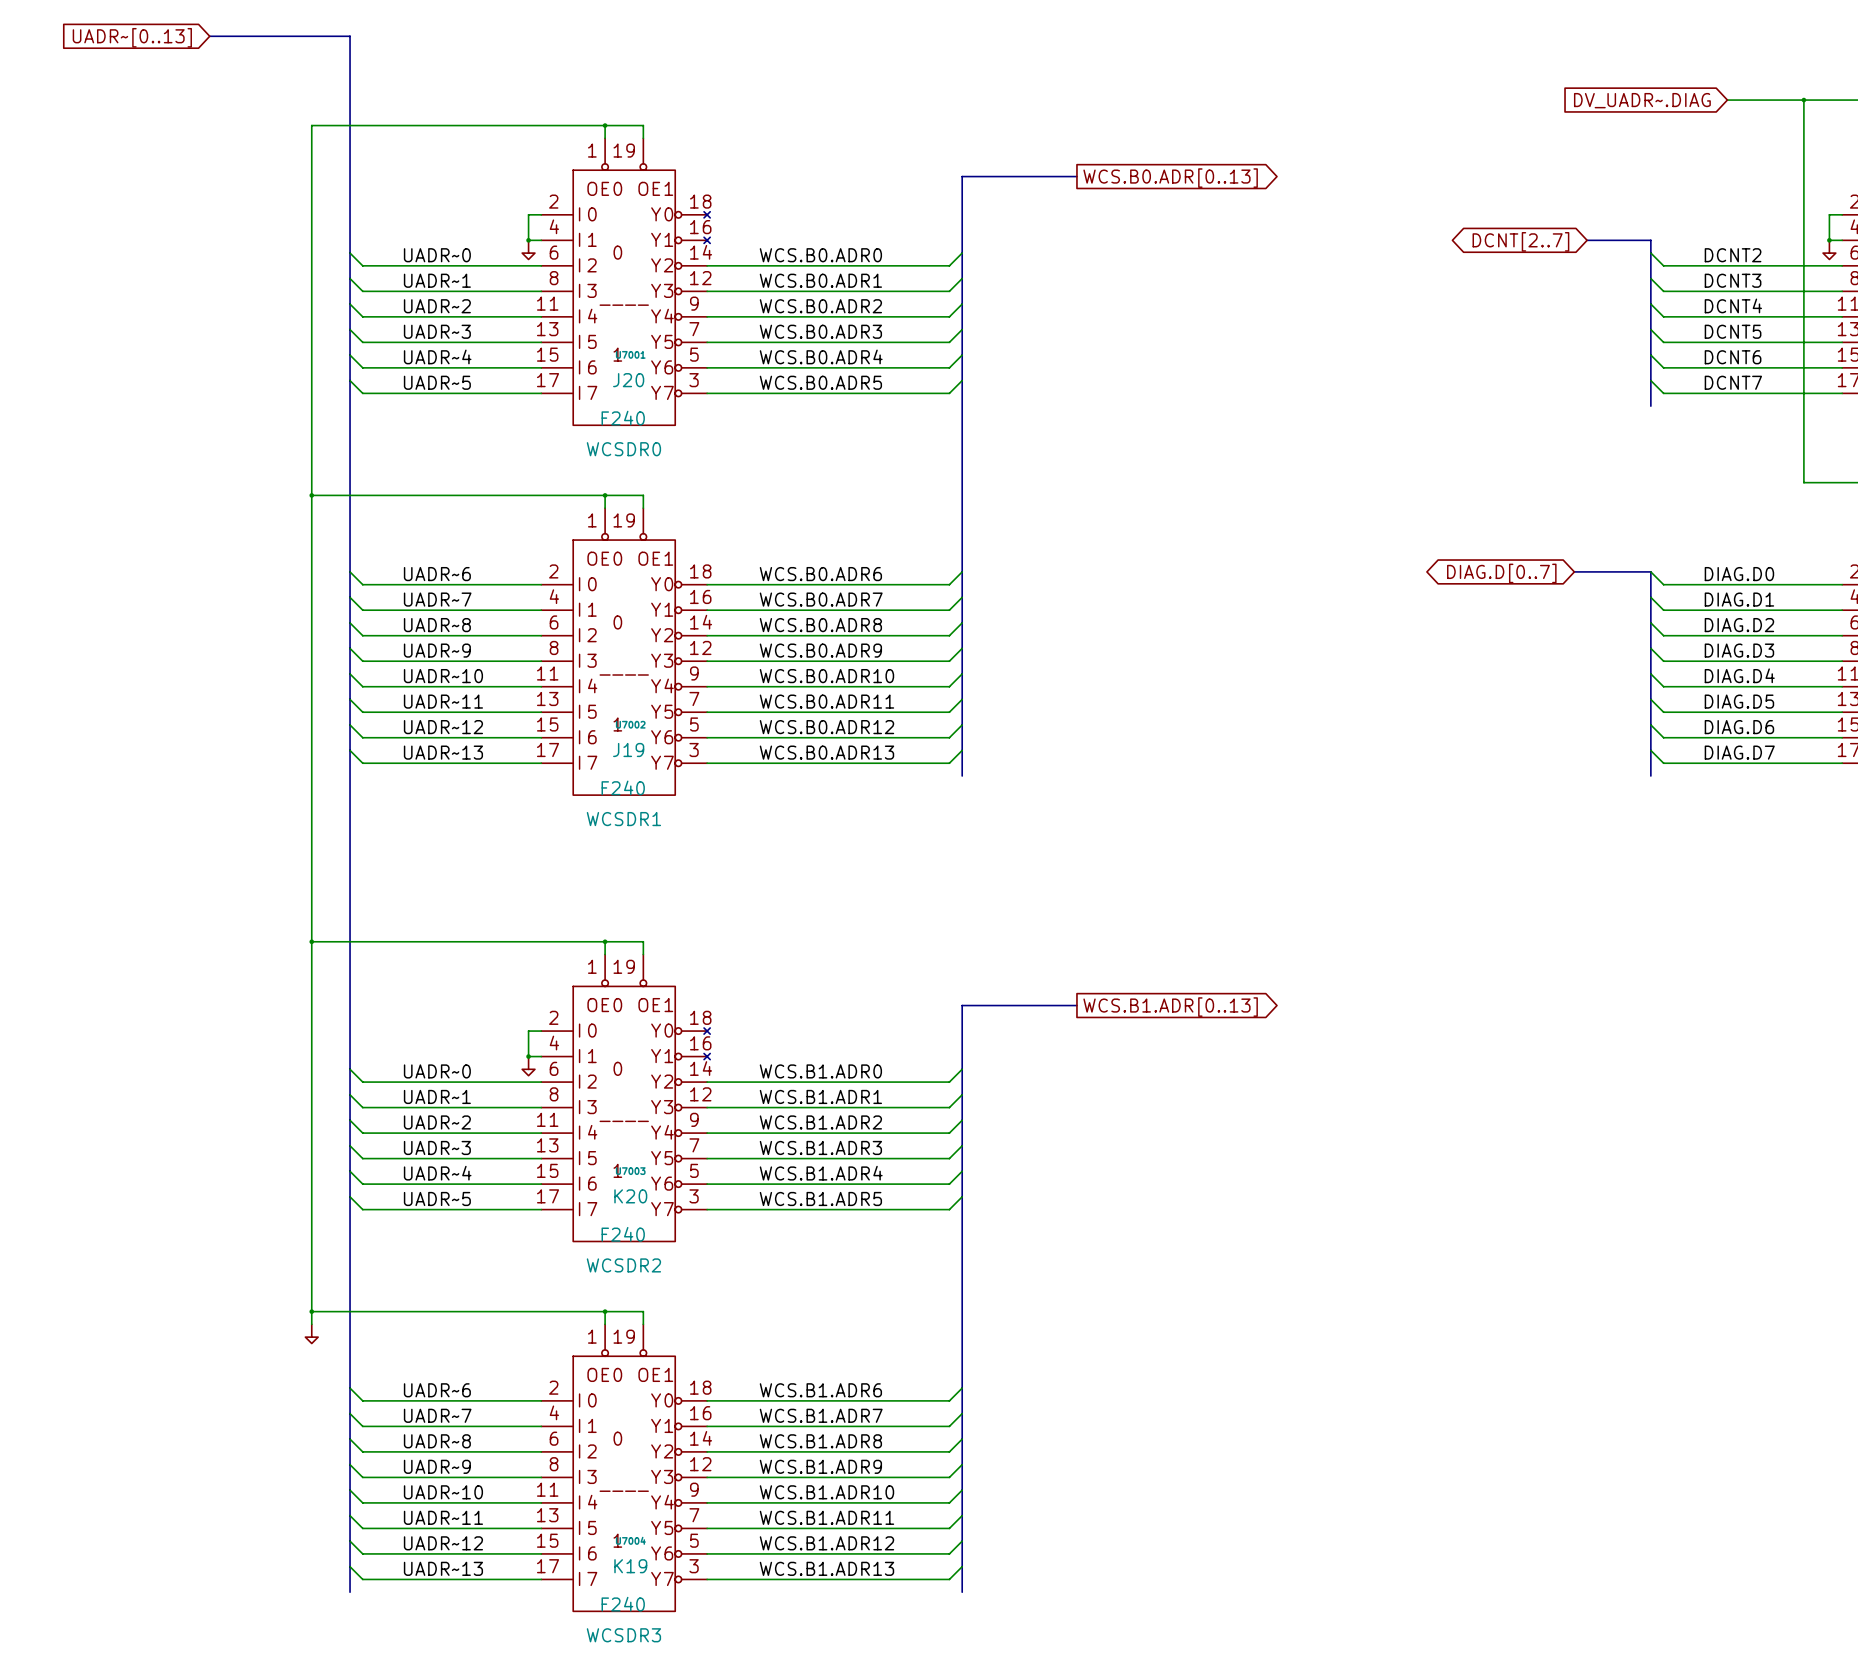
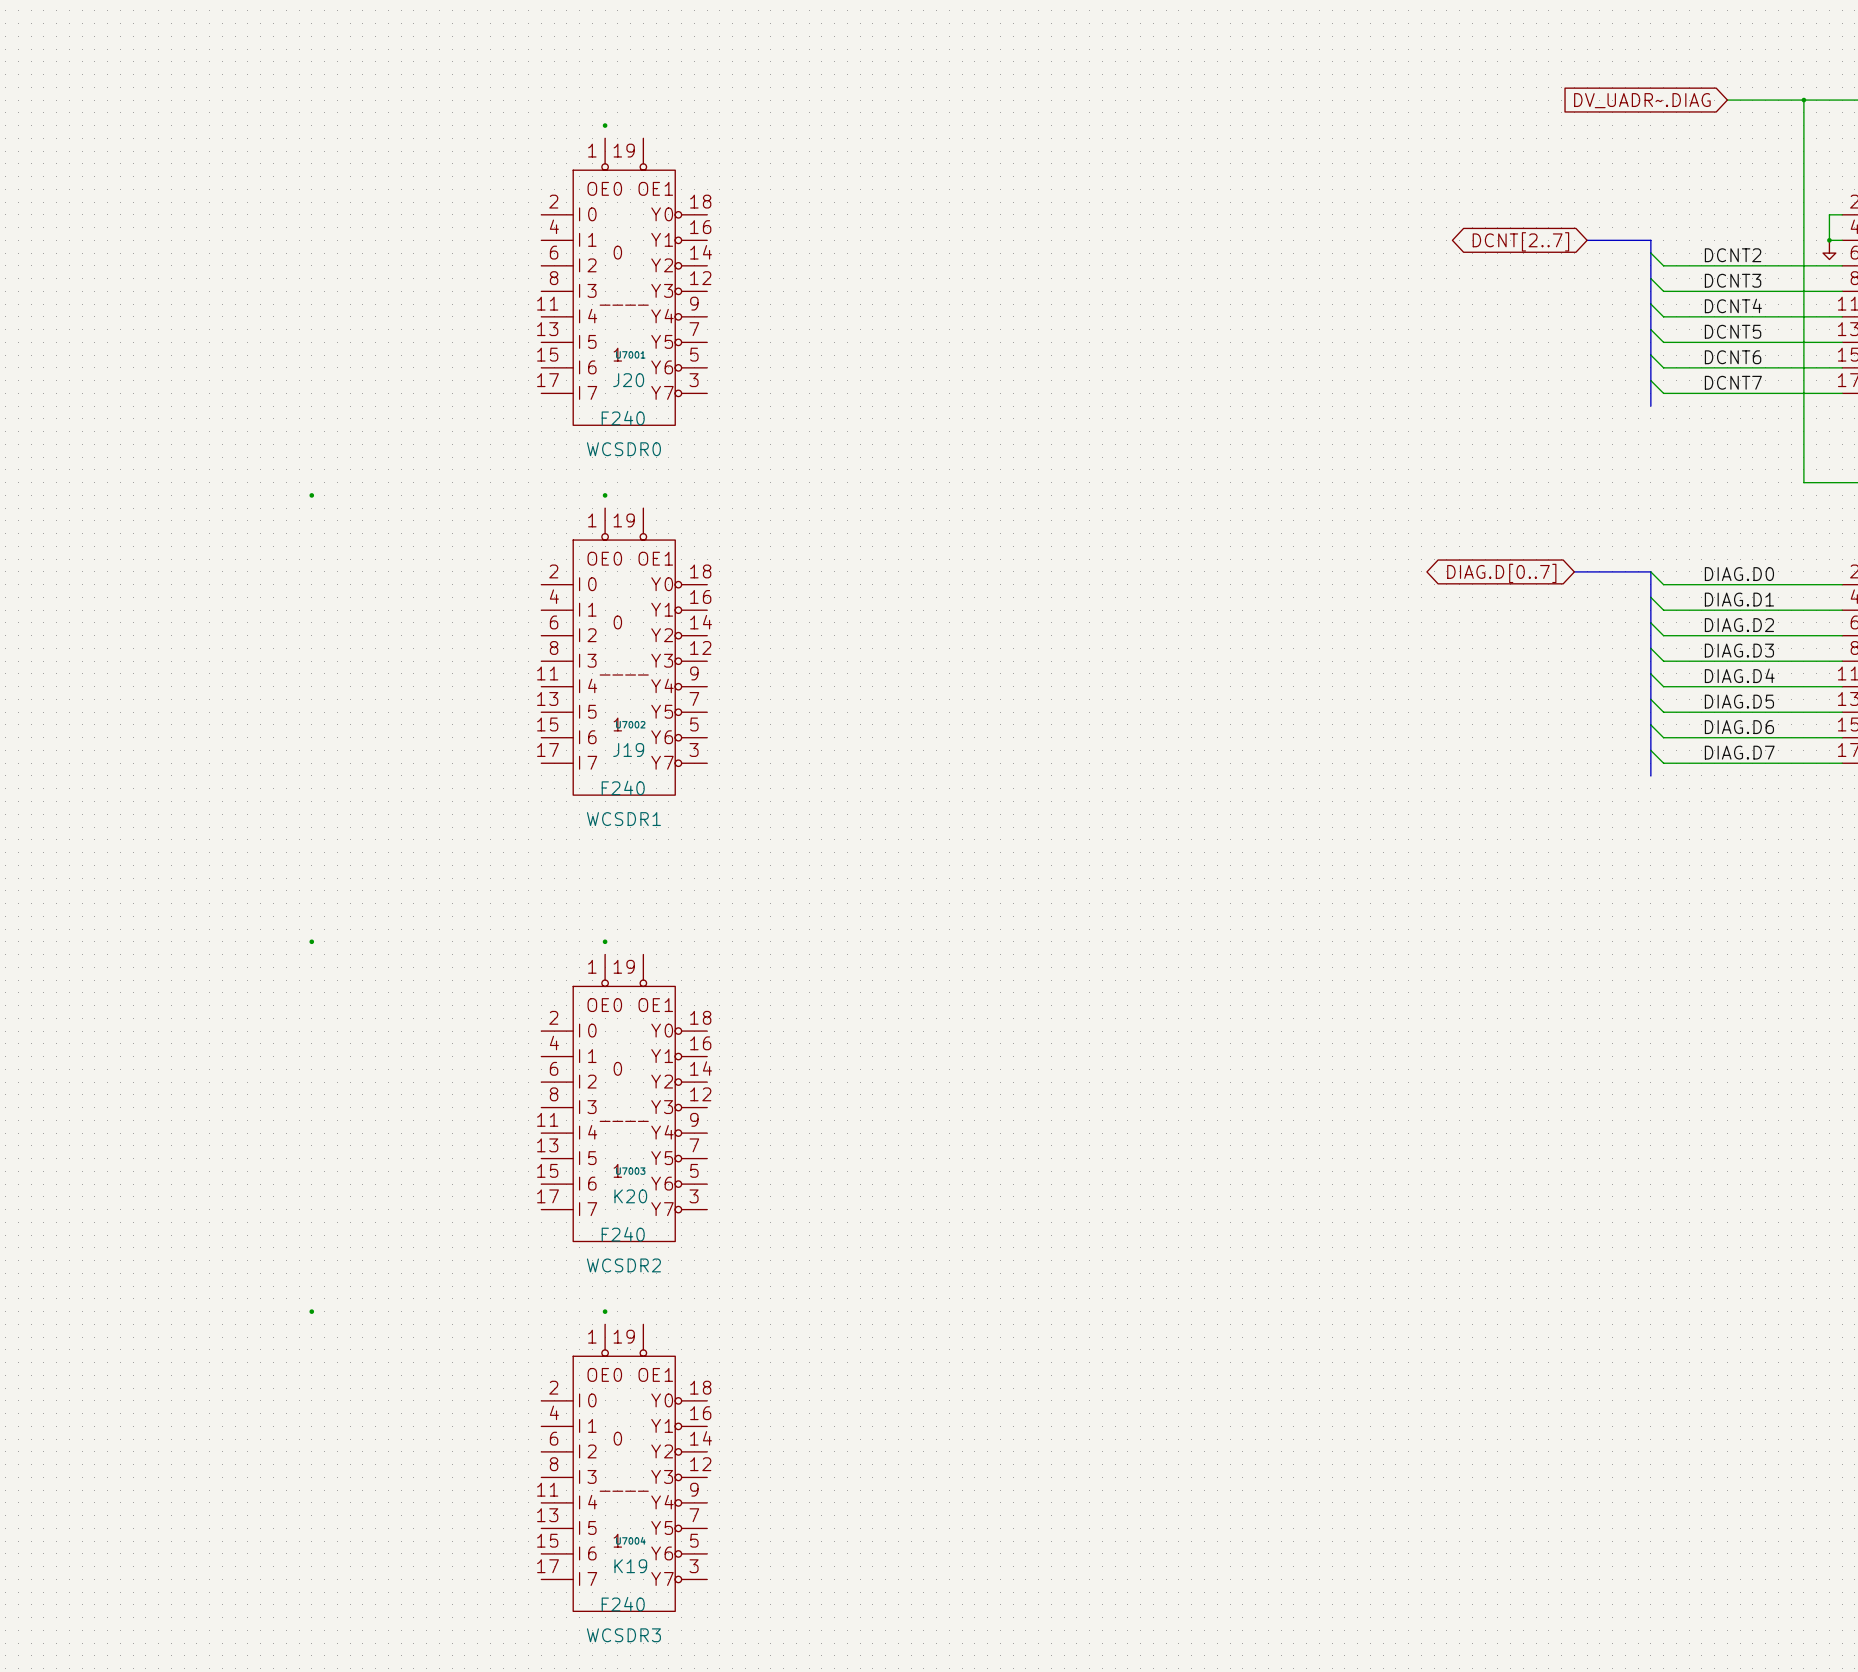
bus: (209, 36) (350, 36) (350, 1592) -> none
global label: UADR~[0..13] (132, 37) -> none
wire: (605, 125) (605, 138) -> none
wire: (643, 138) (643, 125) (311, 125) (311, 1324) -> none
bus: (1076, 176) (962, 176) (962, 775) -> none
global label: WCS.B0.ADR[0..13] (1170, 178) -> none
wire: (541, 214) (528, 214) (528, 240) (541, 240) -> none
no-connect mark: (707, 214) -> none
junction: (528, 240) -> none
no-connect mark: (707, 240) -> none
power symbol: (528, 250) -> none
wire: (350, 253) (362, 265) (541, 265) -> none
wire: (962, 253) (949, 265) (707, 265) -> none
label: UADR~0 (437, 255) -> none
label: WCS.B0.ADR0 (820, 255) -> none
wire: (350, 278) (362, 291) (541, 291) -> none
wire: (962, 278) (949, 291) (707, 291) -> none
label: UADR~1 (437, 280) -> none
label: WCS.B0.ADR1 (820, 280) -> none
wire: (350, 304) (362, 316) (541, 316) -> none
wire: (962, 304) (949, 316) (707, 316) -> none
label: UADR~2 (437, 306) -> none
label: WCS.B0.ADR2 (820, 306) -> none
wire: (350, 329) (362, 342) (541, 342) -> none
wire: (962, 329) (949, 342) (707, 342) -> none
label: UADR~3 (437, 331) -> none
label: WCS.B0.ADR3 (820, 331) -> none
wire: (350, 355) (362, 367) (541, 367) -> none
wire: (962, 355) (949, 367) (707, 367) -> none
label: UADR~4 (437, 356) -> none
label: WCS.B0.ADR4 (821, 356) -> none
wire: (350, 380) (362, 393) (541, 393) -> none
wire: (962, 380) (949, 393) (707, 393) -> none
label: UADR~5 (437, 382) -> none
label: WCS.B0.ADR5 (820, 382) -> none
wire: (311, 495) (643, 495) (643, 508) -> none
wire: (605, 495) (605, 508) -> none
wire: (350, 571) (362, 584) (541, 584) -> none
wire: (962, 571) (949, 584) (707, 584) -> none
label: UADR~6 (437, 574) -> none
label: WCS.B0.ADR6 (820, 574) -> none
wire: (350, 597) (362, 610) (541, 610) -> none
wire: (962, 597) (949, 610) (707, 610) -> none
label: UADR~7 (437, 599) -> none
label: WCS.B0.ADR7 (821, 599) -> none
wire: (350, 622) (362, 635) (541, 635) -> none
wire: (962, 622) (949, 635) (707, 635) -> none
label: UADR~8 (437, 625) -> none
label: WCS.B0.ADR8 (820, 625) -> none
wire: (350, 648) (362, 661) (541, 661) -> none
wire: (962, 648) (949, 661) (707, 661) -> none
label: UADR~9 (437, 650) -> none
label: WCS.B0.ADR9 (820, 650) -> none
wire: (350, 673) (362, 686) (541, 686) -> none
wire: (962, 673) (949, 686) (707, 686) -> none
label: UADR~10 (443, 676) -> none
label: WCS.B0.ADR10 (826, 676) -> none
wire: (350, 699) (362, 712) (541, 712) -> none
wire: (962, 699) (949, 712) (707, 712) -> none
label: UADR~11 (443, 701) -> none
label: WCS.B0.ADR11 (826, 701) -> none
wire: (350, 724) (362, 737) (541, 737) -> none
wire: (962, 724) (949, 737) (707, 737) -> none
label: UADR~12 (443, 727) -> none
label: WCS.B0.ADR12 (826, 727) -> none
wire: (350, 750) (362, 763) (541, 763) -> none
wire: (962, 750) (949, 763) (707, 763) -> none
label: UADR~13 (443, 752) -> none
label: WCS.B0.ADR13 (826, 752) -> none
wire: (311, 941) (643, 941) (643, 954) -> none
wire: (605, 941) (605, 954) -> none
bus: (1076, 1005) (962, 1005) (962, 1592) -> none
global label: WCS.B1.ADR[0..13] (1170, 1007) -> none
wire: (541, 1031) (528, 1031) (528, 1056) (541, 1056) -> none
no-connect mark: (707, 1031) -> none
junction: (528, 1056) -> none
no-connect mark: (707, 1056) -> none
power symbol: (528, 1066) -> none
wire: (350, 1069) (362, 1082) (541, 1082) -> none
wire: (962, 1069) (949, 1082) (707, 1082) -> none
label: UADR~0 (437, 1071) -> none
label: WCS.B1.ADR0 (820, 1071) -> none
wire: (350, 1094) (362, 1107) (541, 1107) -> none
wire: (962, 1094) (949, 1107) (707, 1107) -> none
label: UADR~1 (437, 1096) -> none
label: WCS.B1.ADR1 (820, 1096) -> none
wire: (350, 1120) (362, 1133) (541, 1133) -> none
wire: (962, 1120) (949, 1133) (707, 1133) -> none
label: UADR~2 (437, 1122) -> none
label: WCS.B1.ADR2 (820, 1122) -> none
wire: (350, 1145) (362, 1158) (541, 1158) -> none
wire: (962, 1145) (949, 1158) (707, 1158) -> none
label: UADR~3 (437, 1147) -> none
label: WCS.B1.ADR3 (820, 1147) -> none
wire: (350, 1171) (362, 1184) (541, 1184) -> none
wire: (962, 1171) (949, 1184) (707, 1184) -> none
label: UADR~4 (437, 1173) -> none
label: WCS.B1.ADR4 (821, 1173) -> none
wire: (350, 1196) (362, 1209) (541, 1209) -> none
wire: (962, 1196) (949, 1209) (707, 1209) -> none
label: UADR~5 (437, 1198) -> none
label: WCS.B1.ADR5 (820, 1198) -> none
wire: (311, 1311) (643, 1311) (643, 1324) -> none
wire: (605, 1311) (605, 1324) -> none
power symbol: (311, 1334) -> none
wire: (350, 1388) (362, 1400) (541, 1400) -> none
wire: (962, 1388) (949, 1400) (707, 1400) -> none
label: UADR~6 (437, 1390) -> none
label: WCS.B1.ADR6 (820, 1390) -> none
wire: (350, 1413) (362, 1426) (541, 1426) -> none
wire: (962, 1413) (949, 1426) (707, 1426) -> none
label: UADR~7 (437, 1415) -> none
label: WCS.B1.ADR7 (821, 1415) -> none
wire: (350, 1439) (362, 1451) (541, 1451) -> none
wire: (962, 1439) (949, 1451) (707, 1451) -> none
label: UADR~8 (437, 1441) -> none
label: WCS.B1.ADR8 (820, 1441) -> none
wire: (350, 1464) (362, 1477) (541, 1477) -> none
wire: (962, 1464) (949, 1477) (707, 1477) -> none
label: UADR~9 (437, 1466) -> none
label: WCS.B1.ADR9 (820, 1466) -> none
wire: (350, 1490) (362, 1502) (541, 1502) -> none
wire: (962, 1490) (949, 1502) (707, 1502) -> none
label: UADR~10 (443, 1492) -> none
label: WCS.B1.ADR10 (826, 1492) -> none
wire: (350, 1515) (362, 1528) (541, 1528) -> none
wire: (962, 1515) (949, 1528) (707, 1528) -> none
label: UADR~11 (443, 1517) -> none
label: WCS.B1.ADR11 (826, 1517) -> none
wire: (350, 1541) (362, 1553) (541, 1553) -> none
wire: (962, 1541) (949, 1553) (707, 1553) -> none
label: UADR~12 (443, 1543) -> none
label: WCS.B1.ADR12 (826, 1543) -> none
wire: (350, 1566) (362, 1579) (541, 1579) -> none
wire: (962, 1566) (949, 1579) (707, 1579) -> none
label: UADR~13 (443, 1568) -> none
label: WCS.B1.ADR13 (826, 1568) -> none

